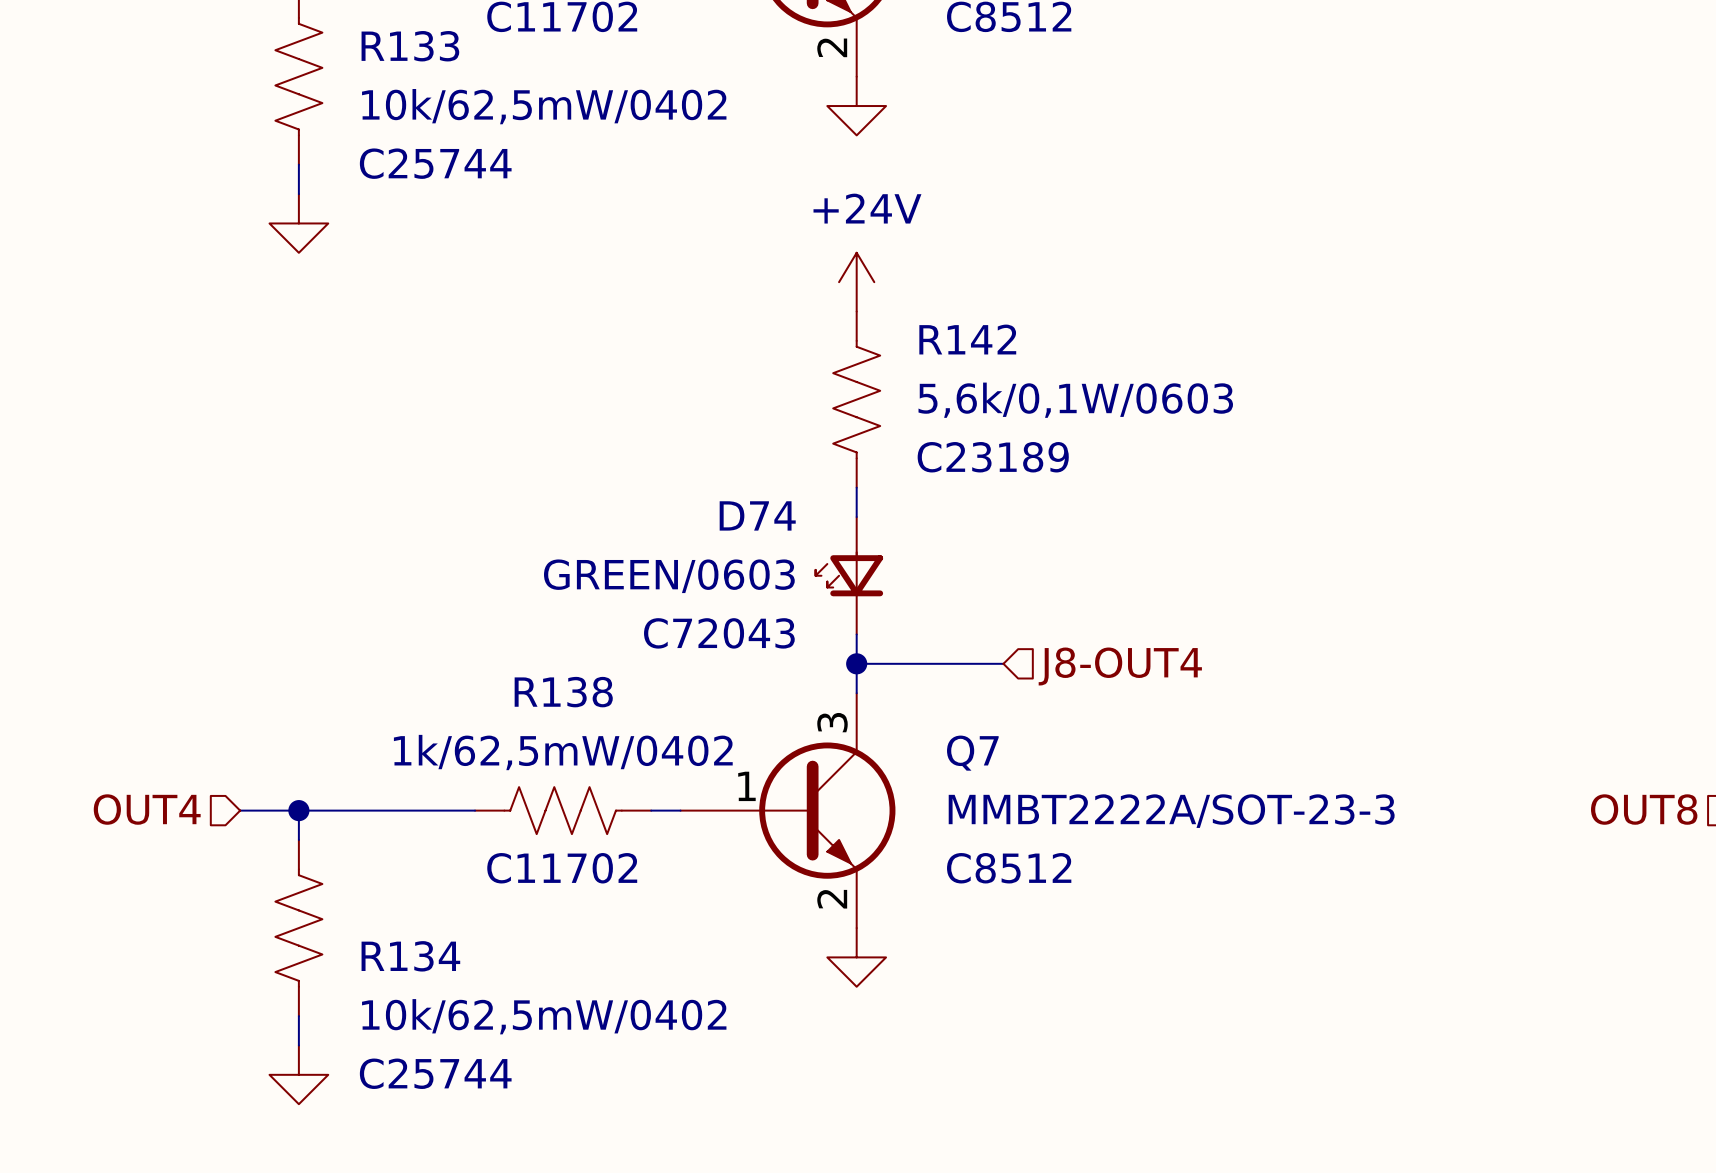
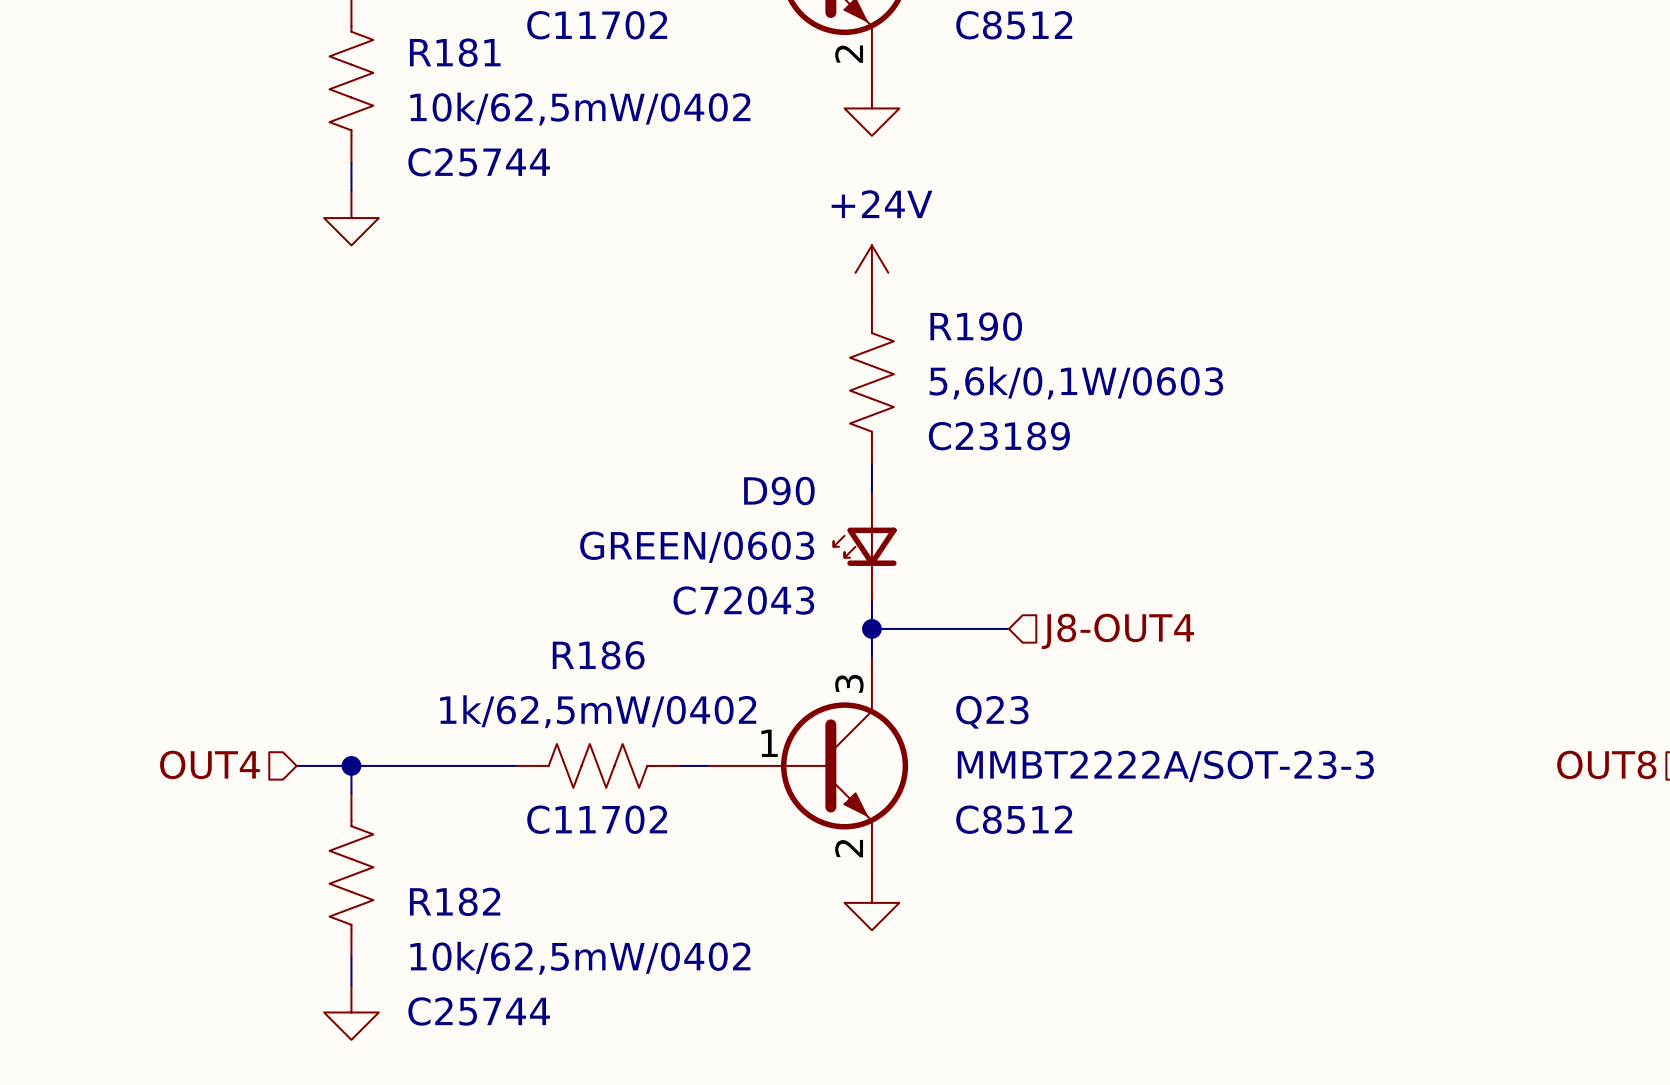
R133 name: R133 (410, 46) -> R181 (455, 52)
R142 name: R142 (967, 339) -> R190 (976, 326)
D74 name: D74 (757, 515) -> D90 (779, 490)
R138 name: R138 (563, 692) -> R186 (598, 655)
Q7 name: Q7 (972, 753) -> Q23 (992, 712)
R134 name: R134 (410, 956) -> R182 (455, 901)

